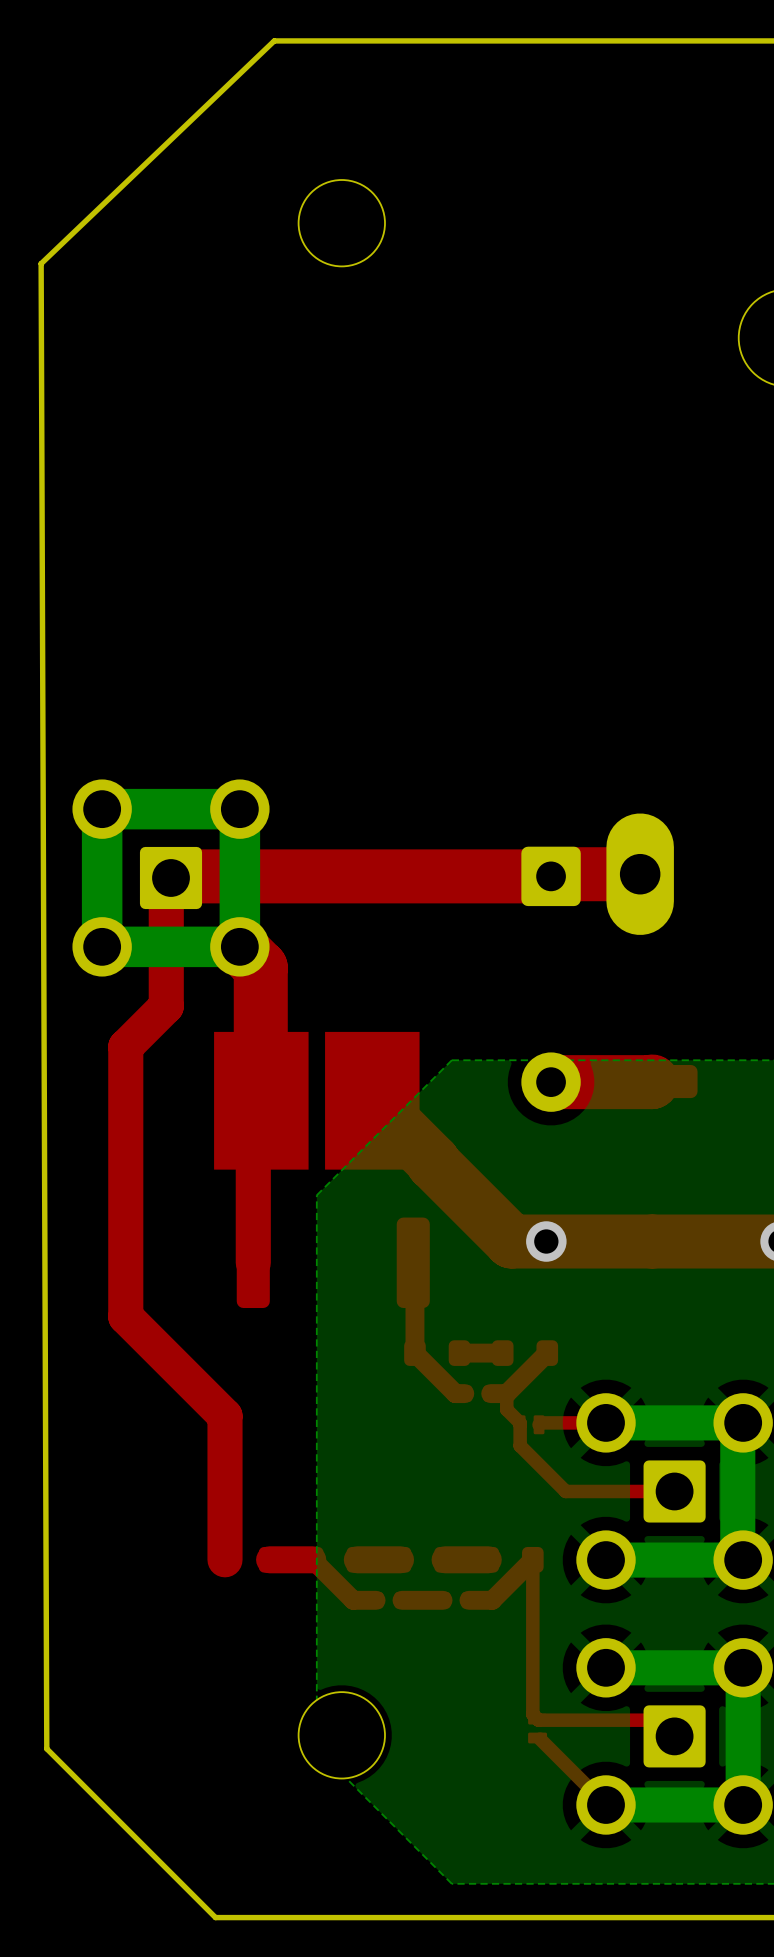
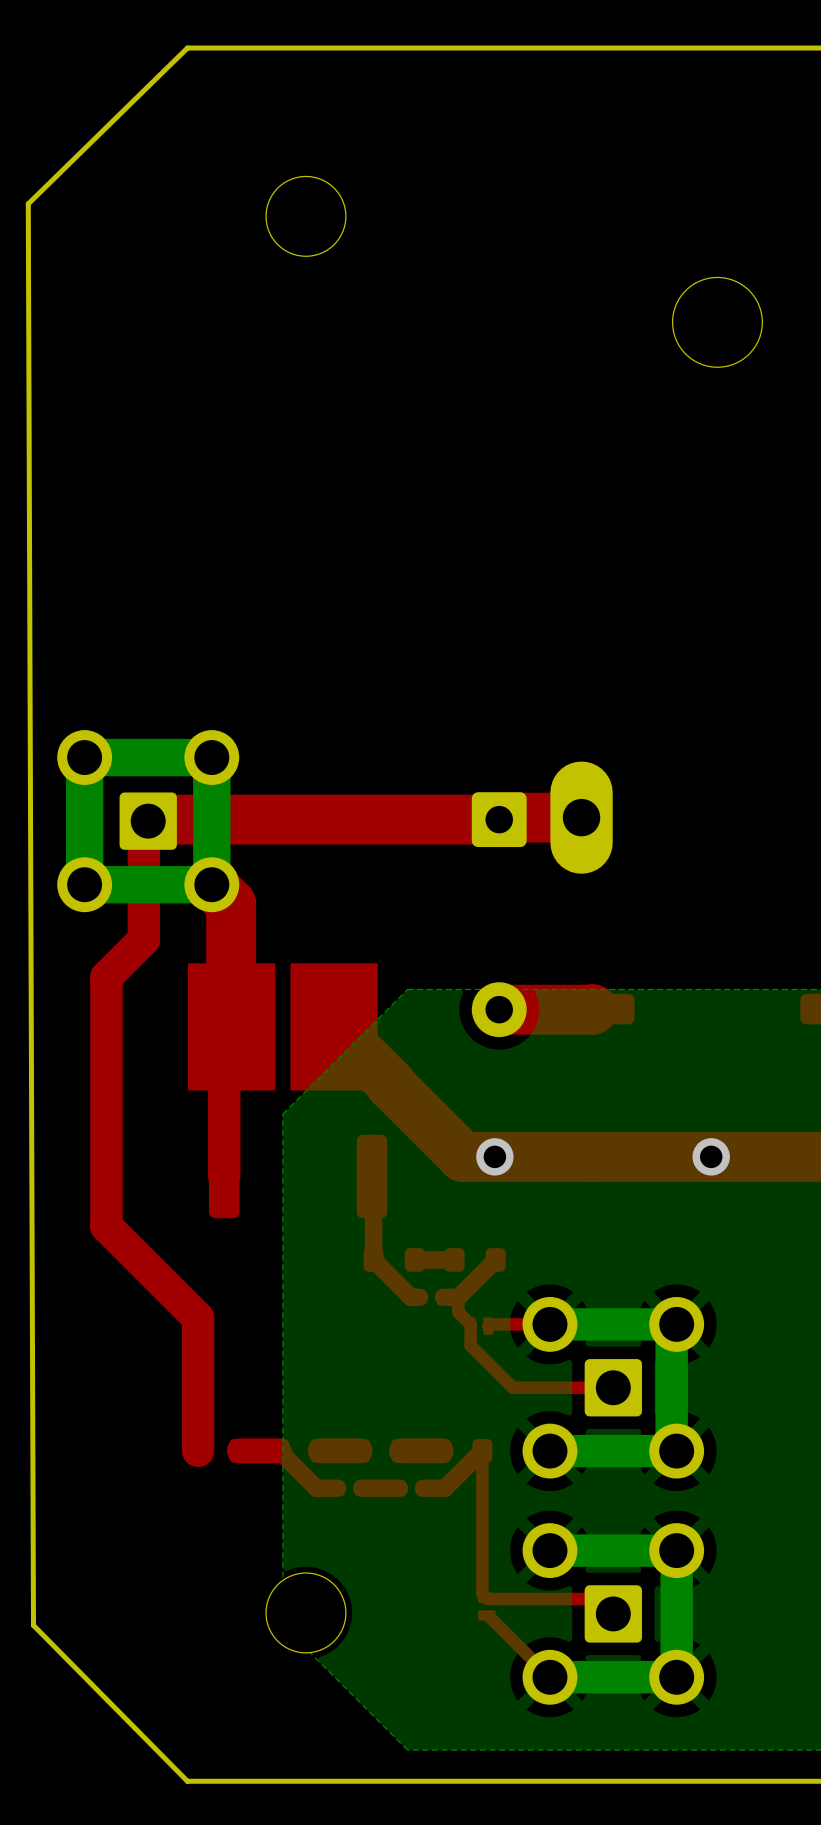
board edge: (274, 40) (41, 263) (46, 1748) (215, 1917) -> (243, 48) (187, 48) (28, 203) (33, 1625) (189, 1781)

